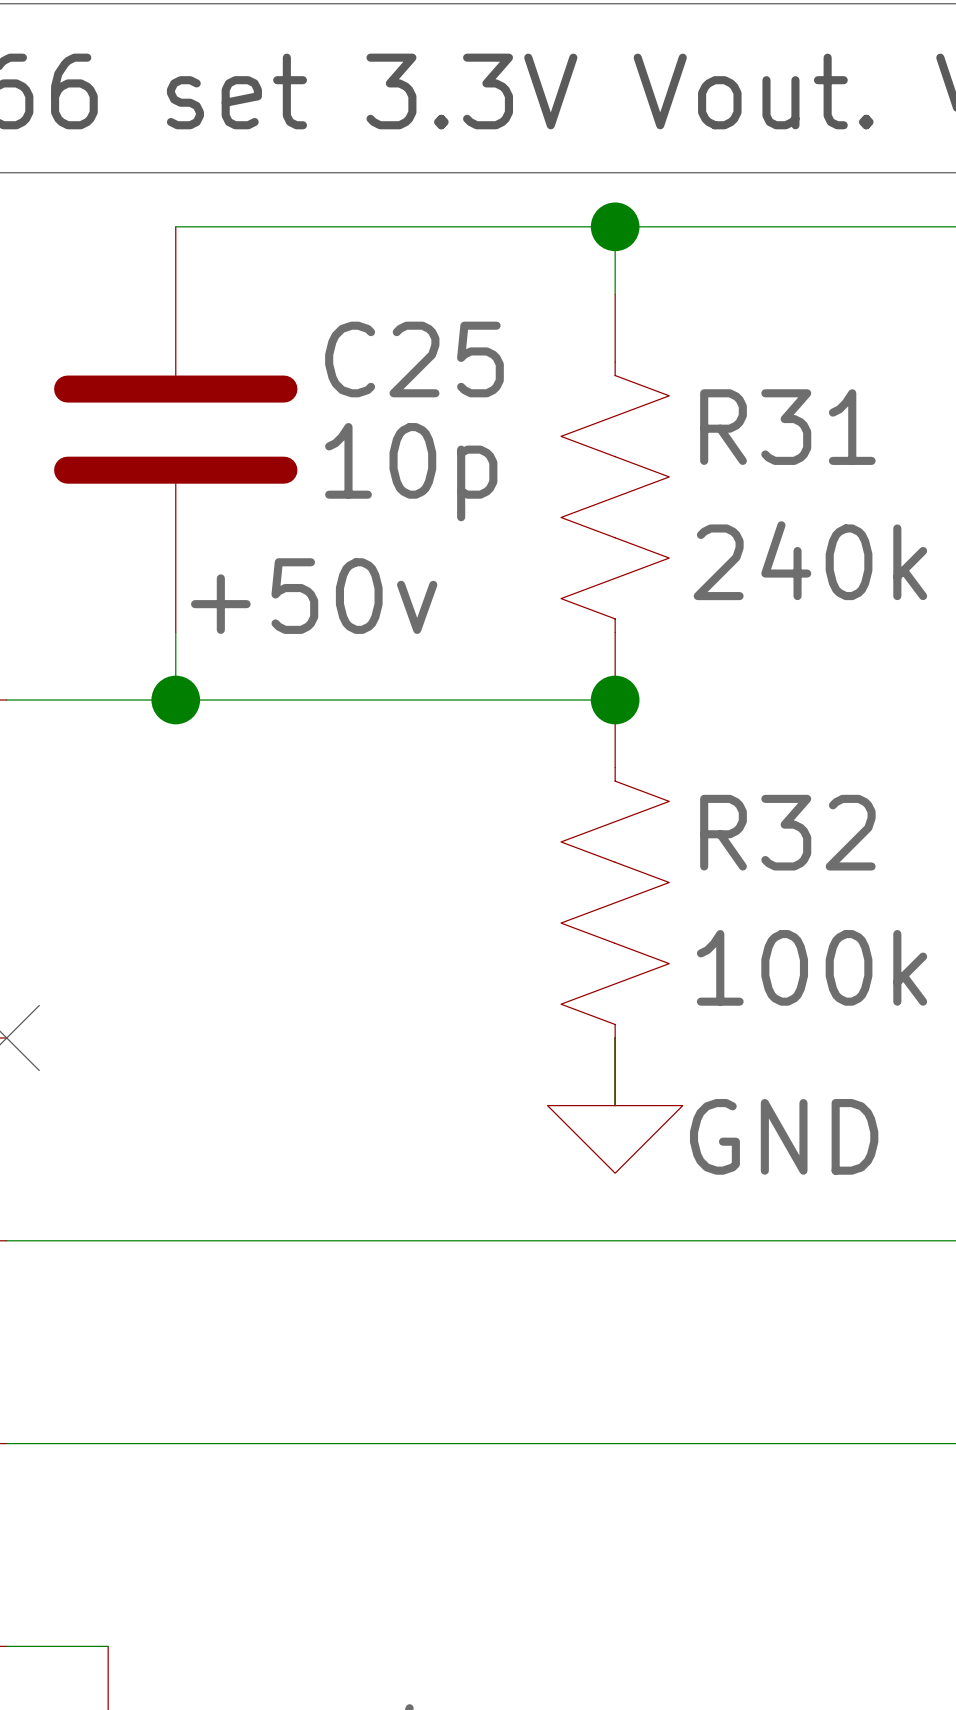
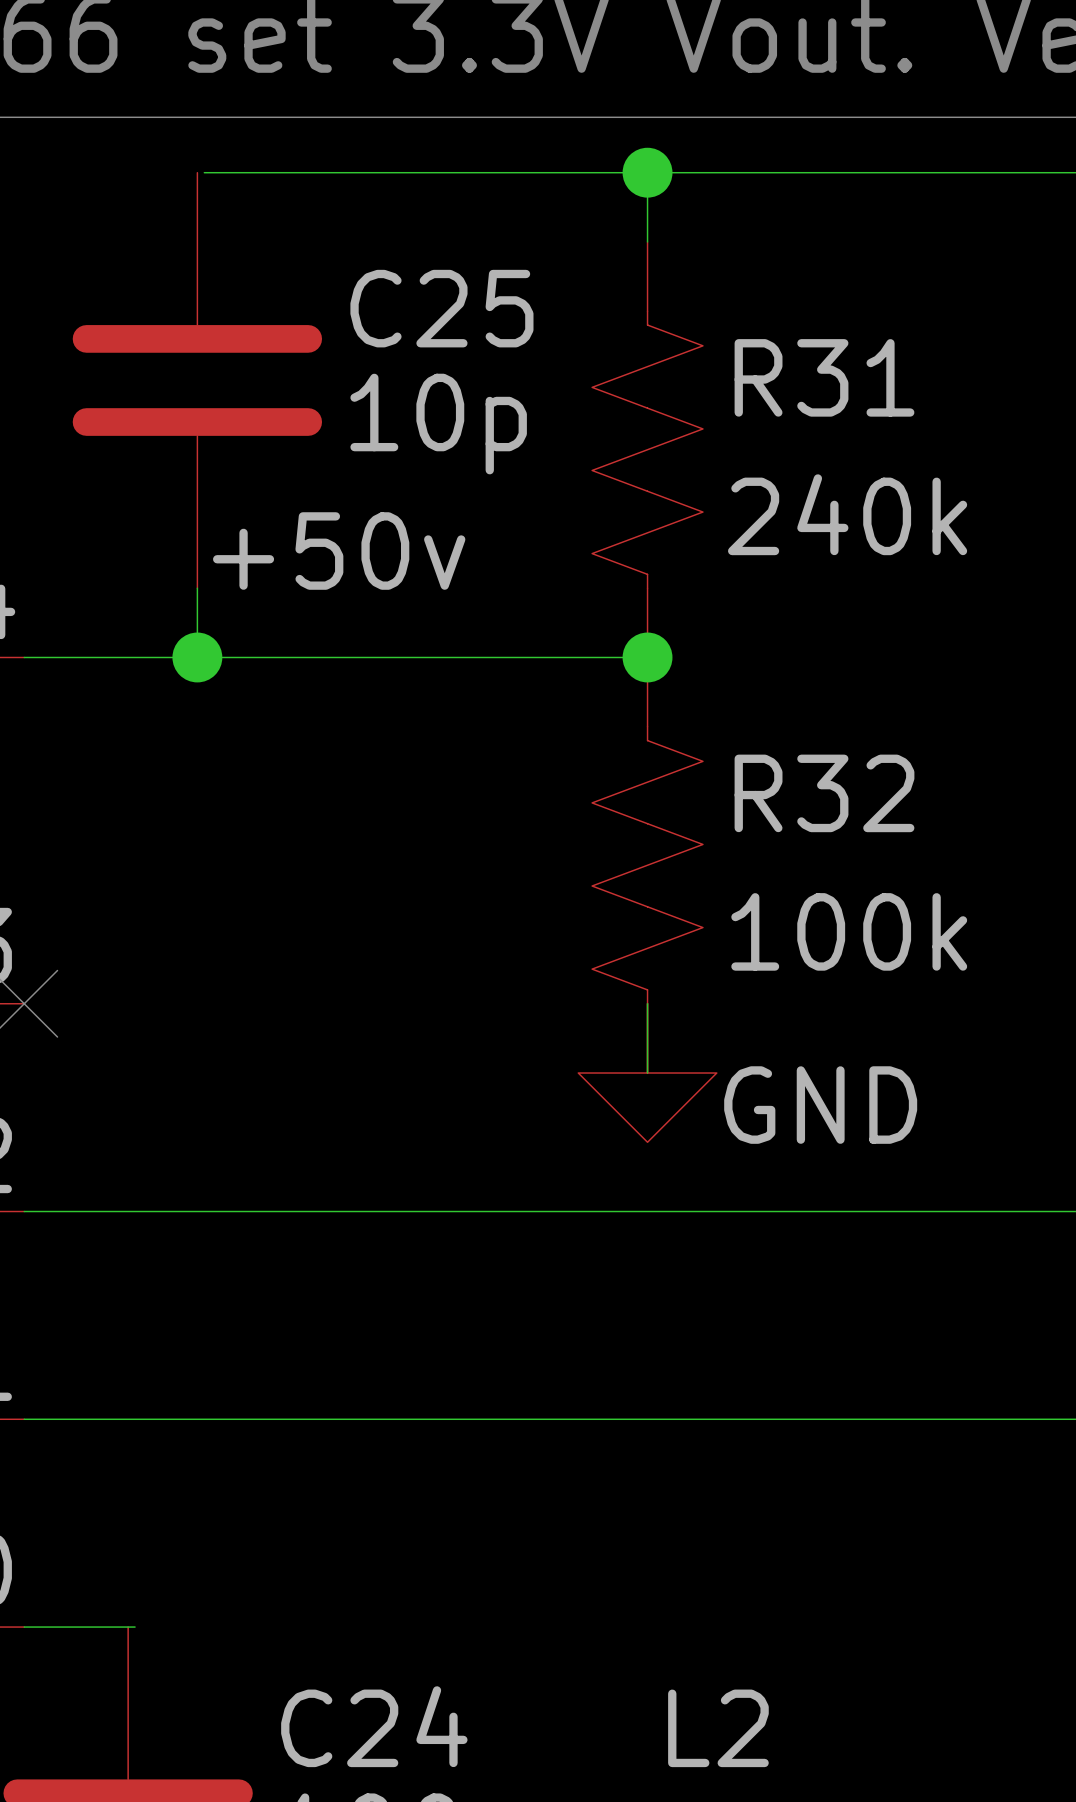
wire: (175, 226) (182, 226) -> none
wire: none -> (128, 1627) (135, 1627)

